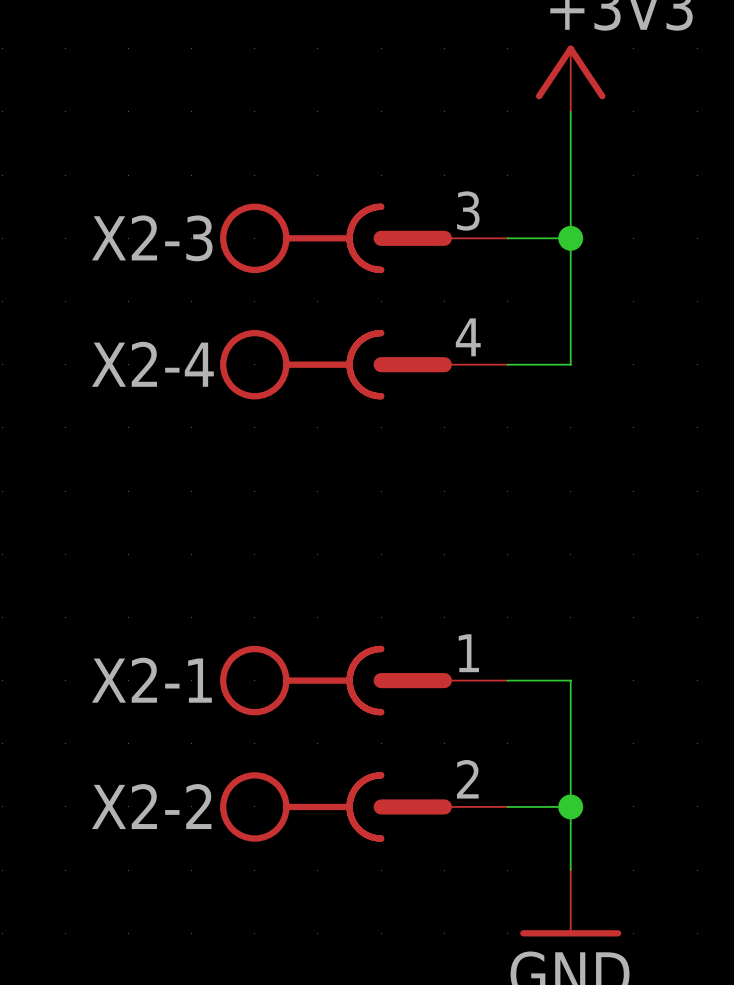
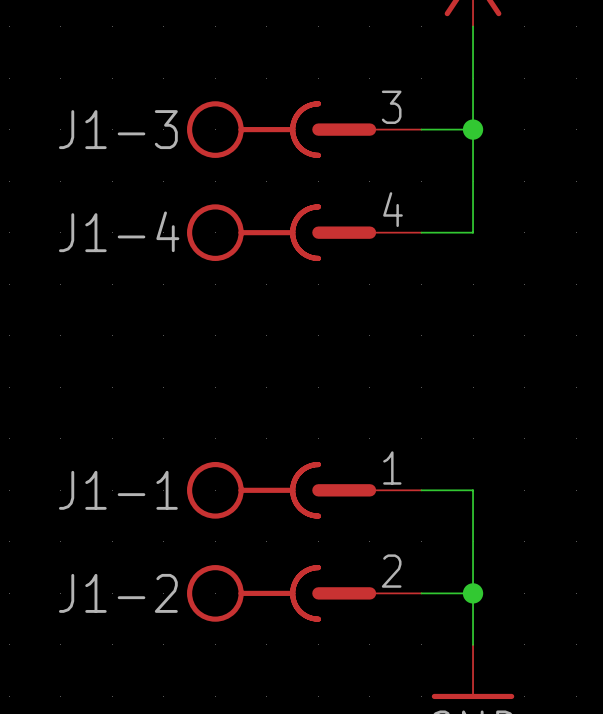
X2-3 name: X2-3 (152, 238) -> J1-3 (118, 129)
X2-4 name: X2-4 (152, 364) -> J1-4 (119, 231)
X2-1 name: X2-1 (151, 680) -> J1-1 (118, 490)
X2-2 name: X2-2 (151, 806) -> J1-2 (118, 593)

